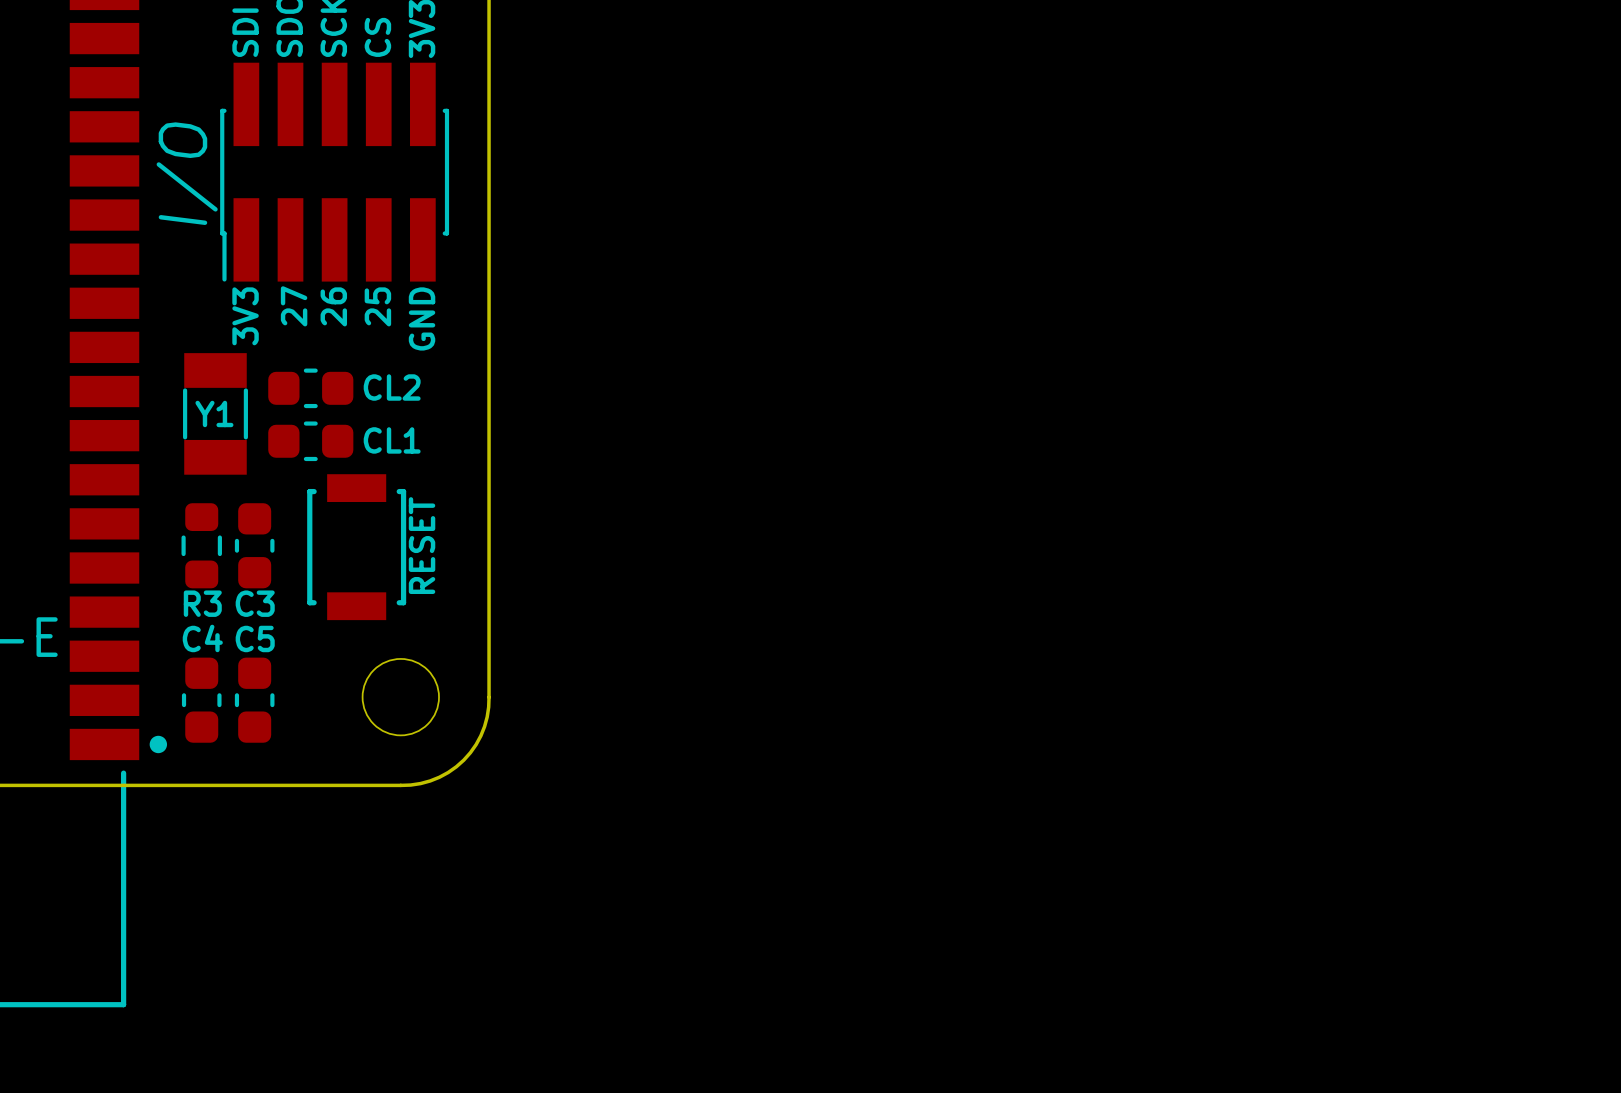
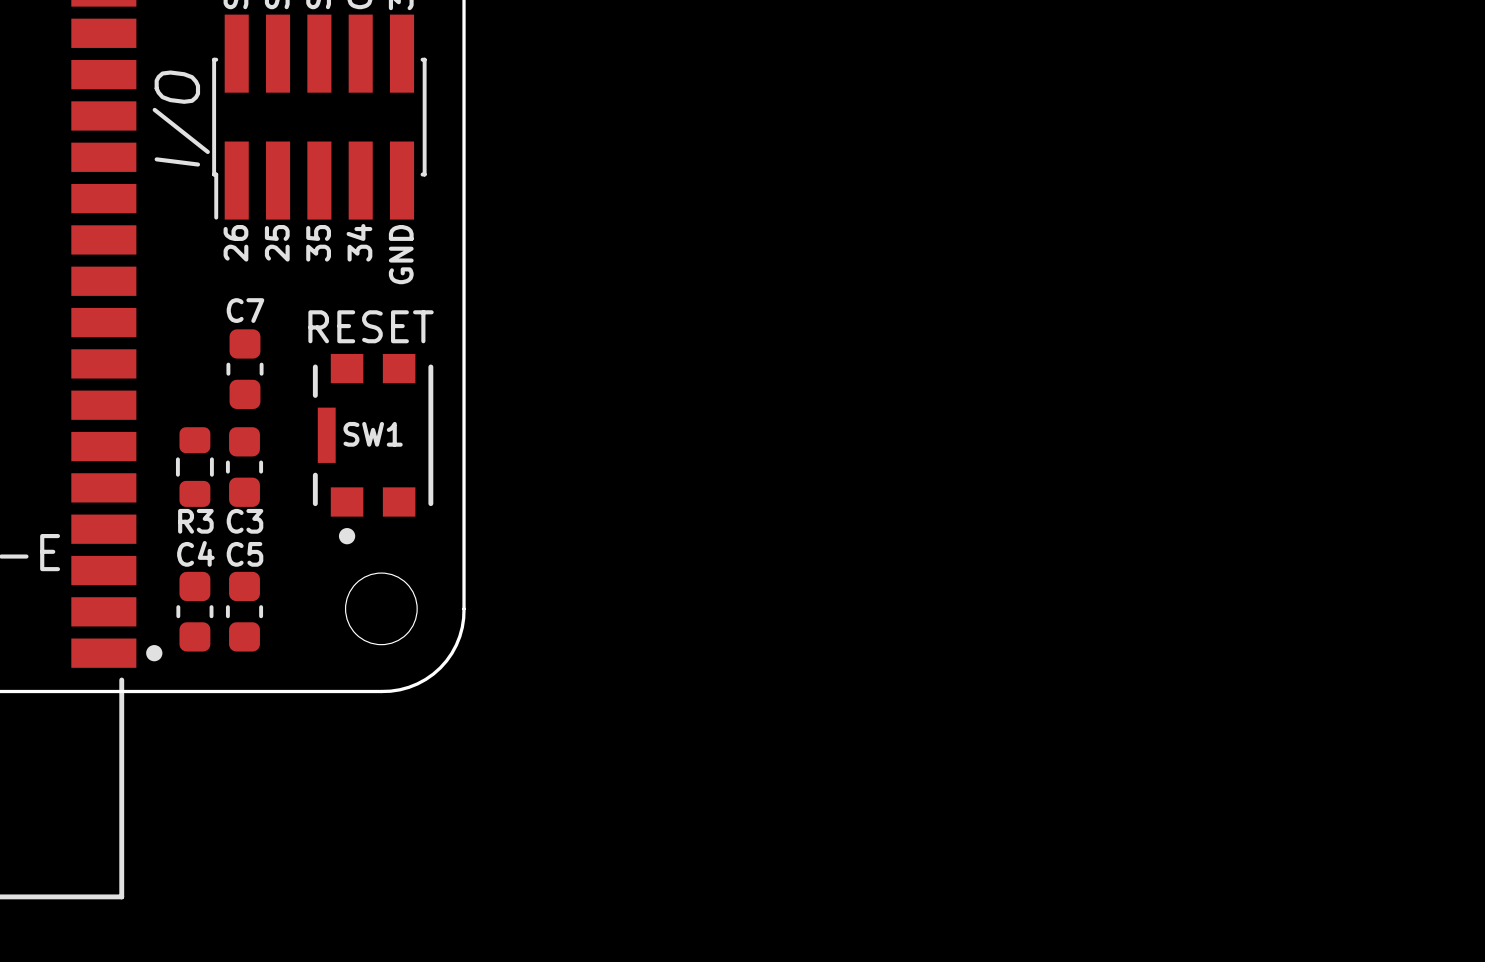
text: 27 (294, 306) -> 25 (277, 243)
text: 26 (333, 306) -> 35 (318, 243)
text: 25 (377, 306) -> 34 (359, 242)
text: 3V3 (245, 316) -> 26 (235, 243)
CL2: (310, 388) -> none
Y1: (215, 413) -> none
C7: none -> (245, 369)
CL1: (310, 441) -> none
SW1: none -> RESET (373, 449)
part: RESET (356, 547) -> none

